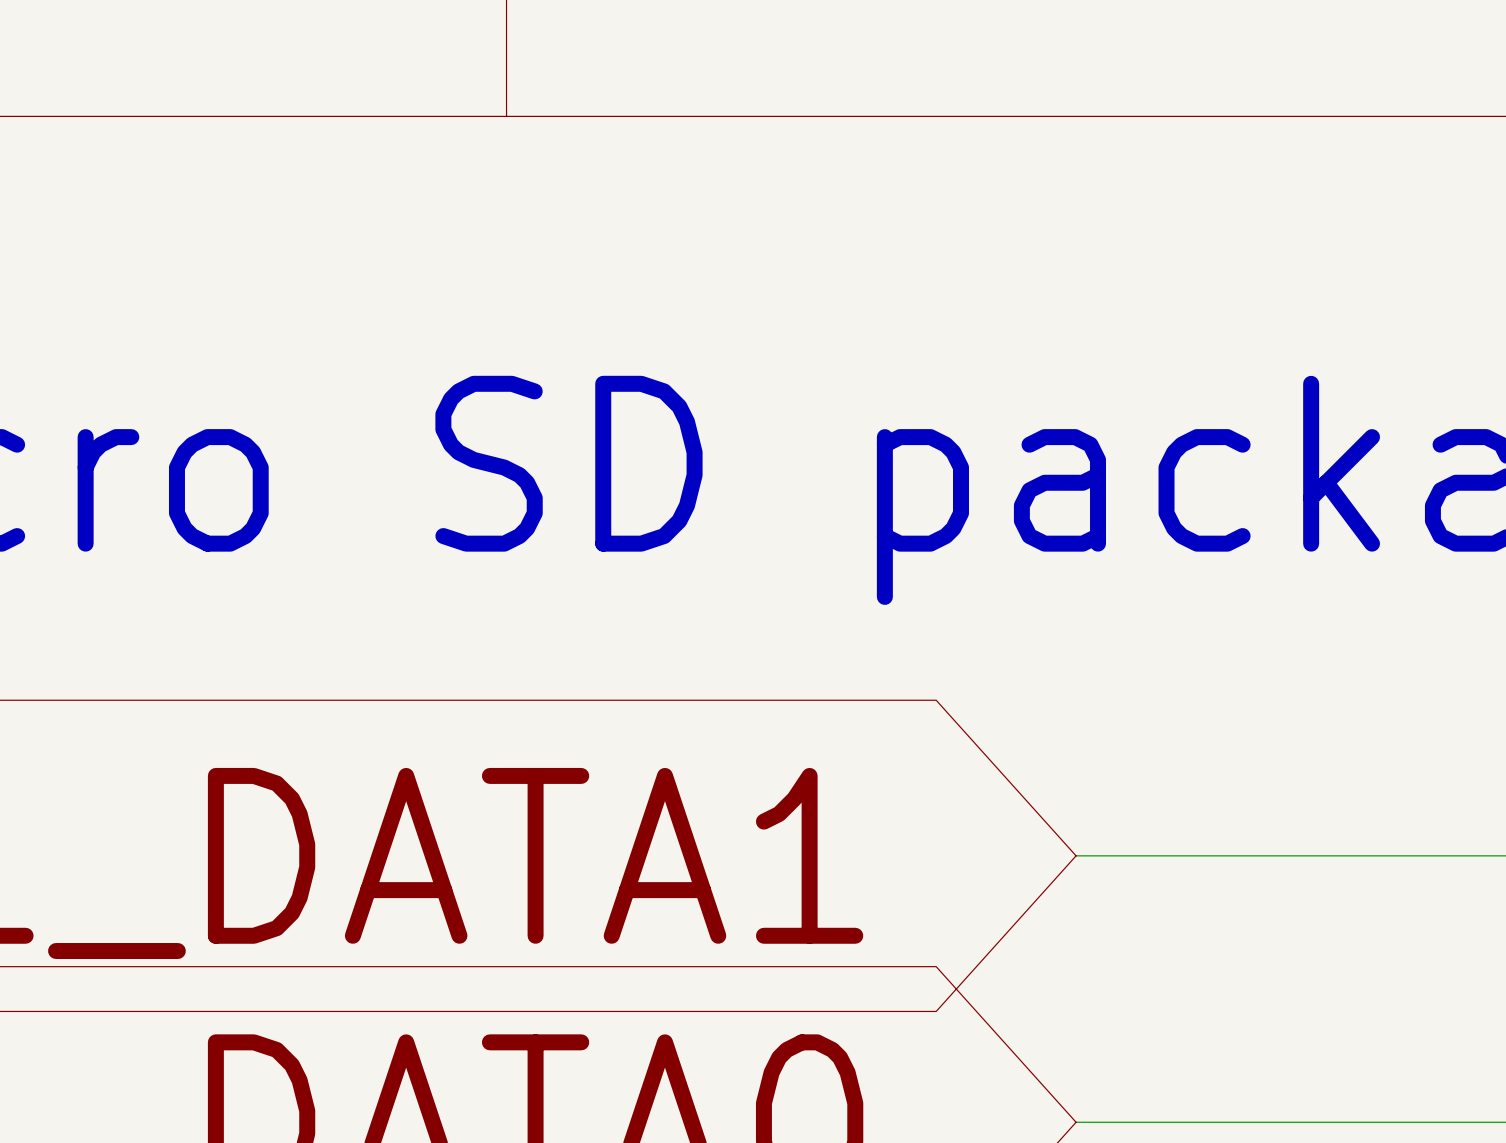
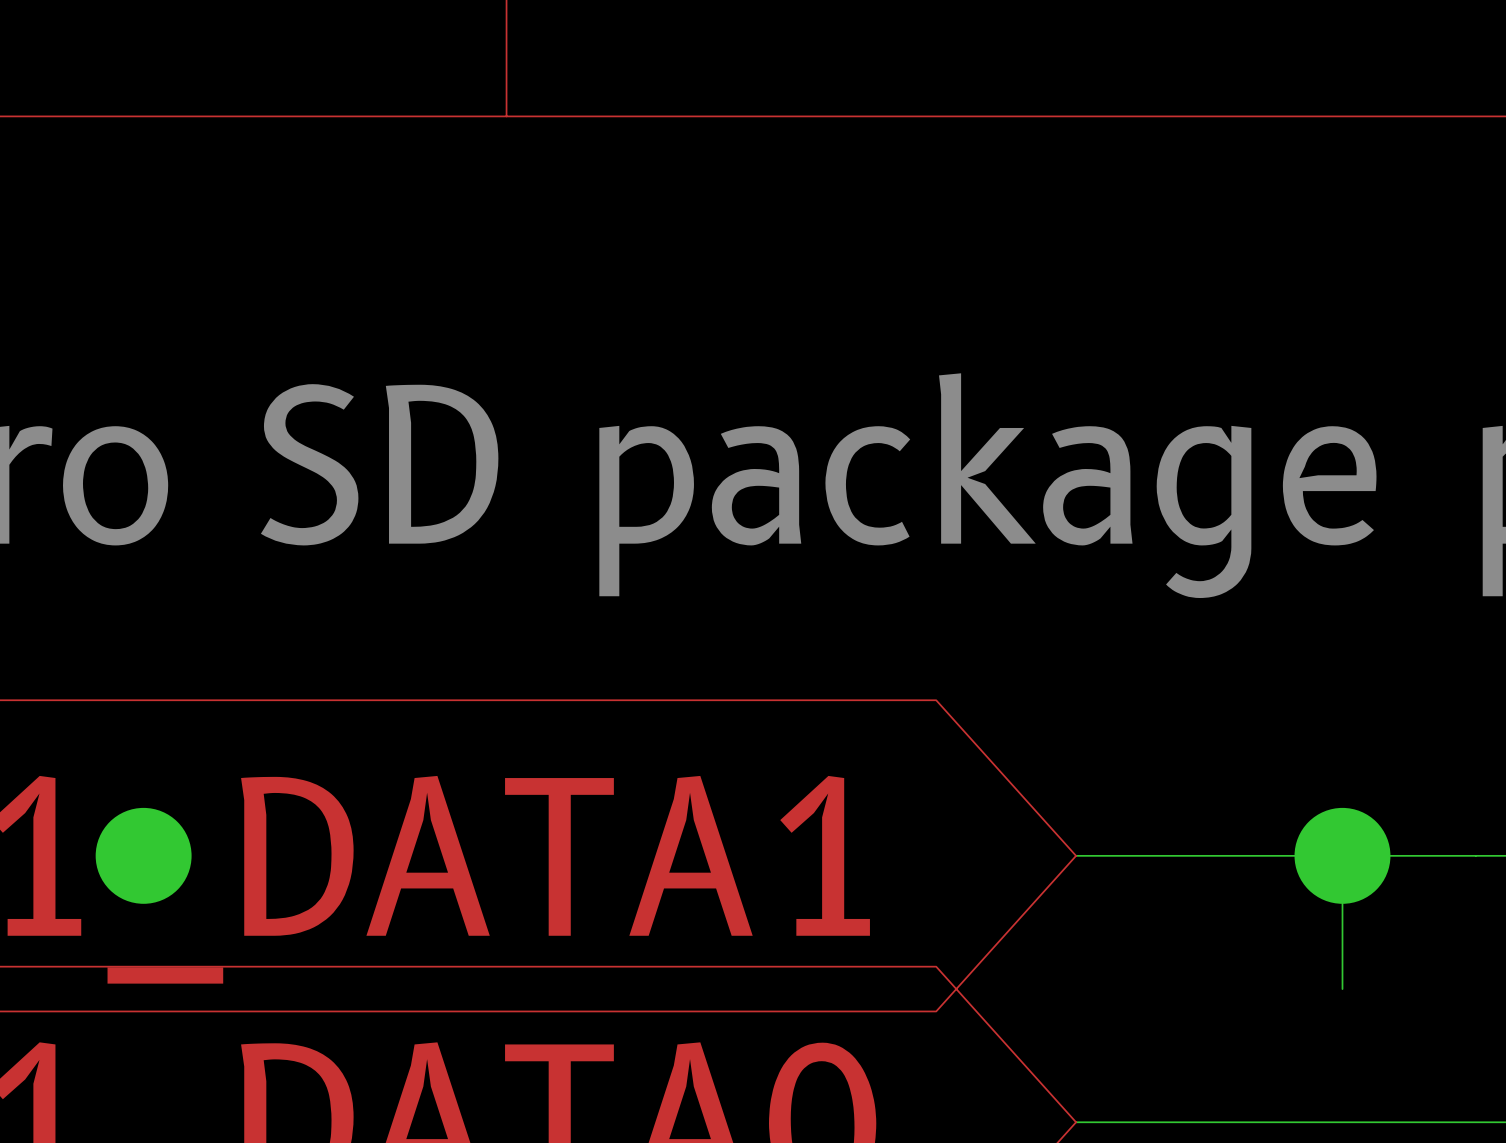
junction: none -> (143, 855)
wire: none -> (1342, 855) (1342, 989)
junction: none -> (1342, 855)

